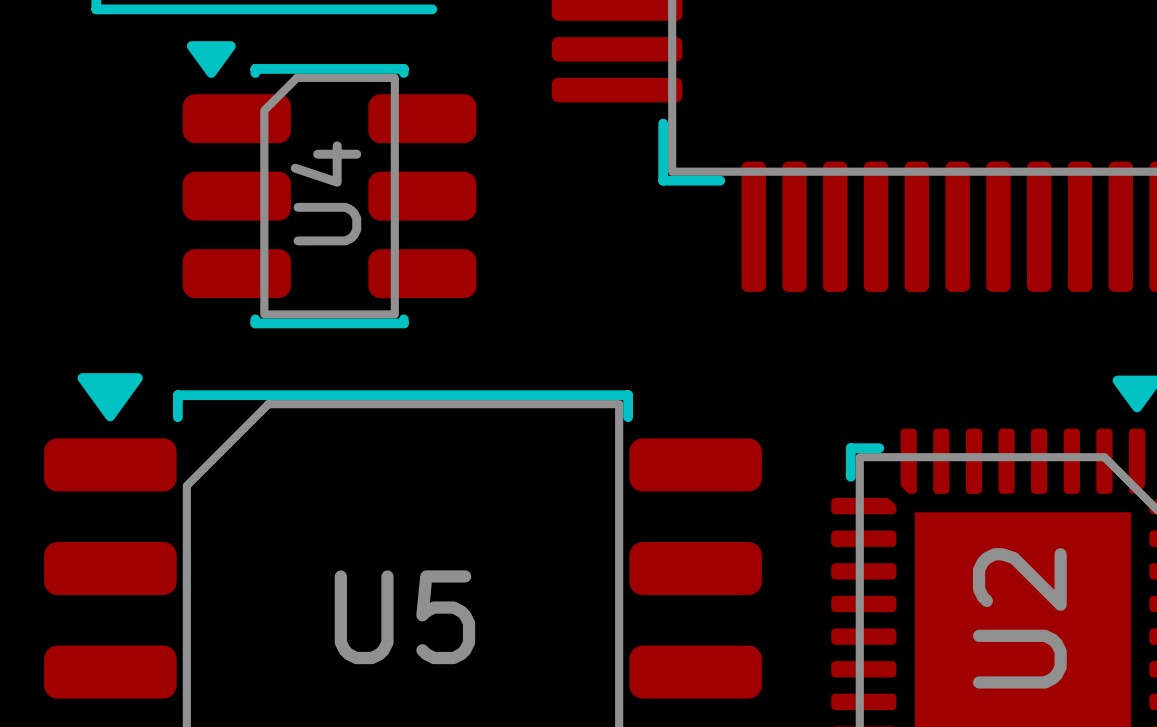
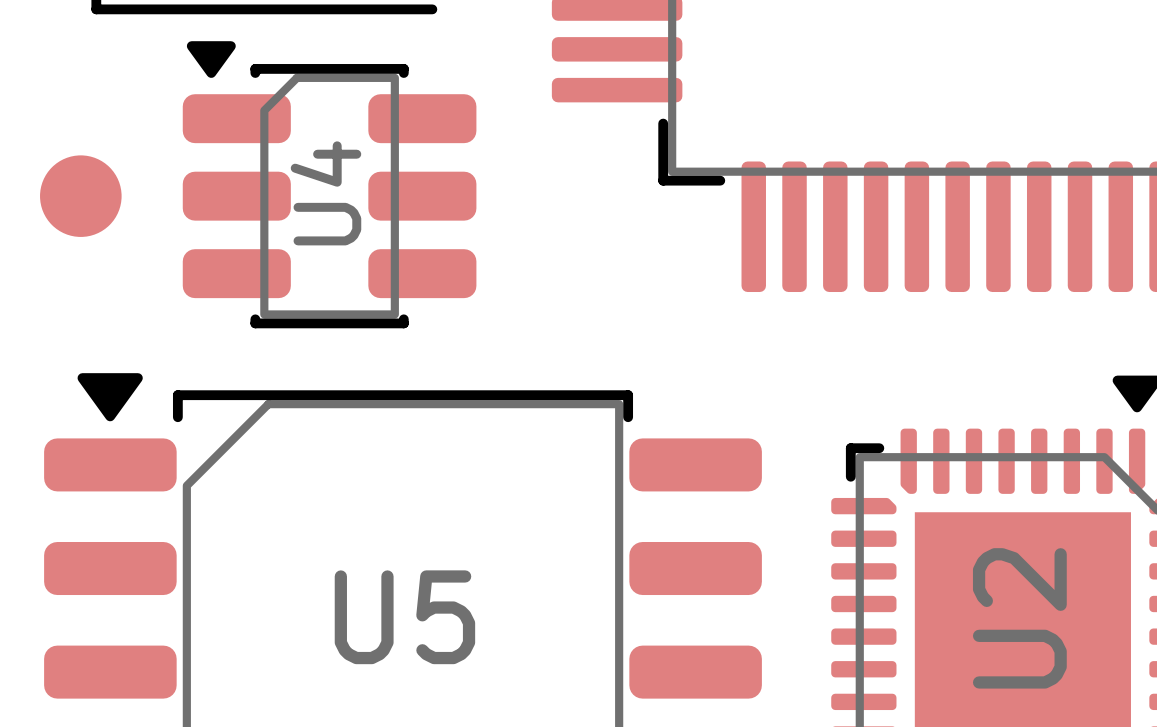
part: none -> (80, 196)

